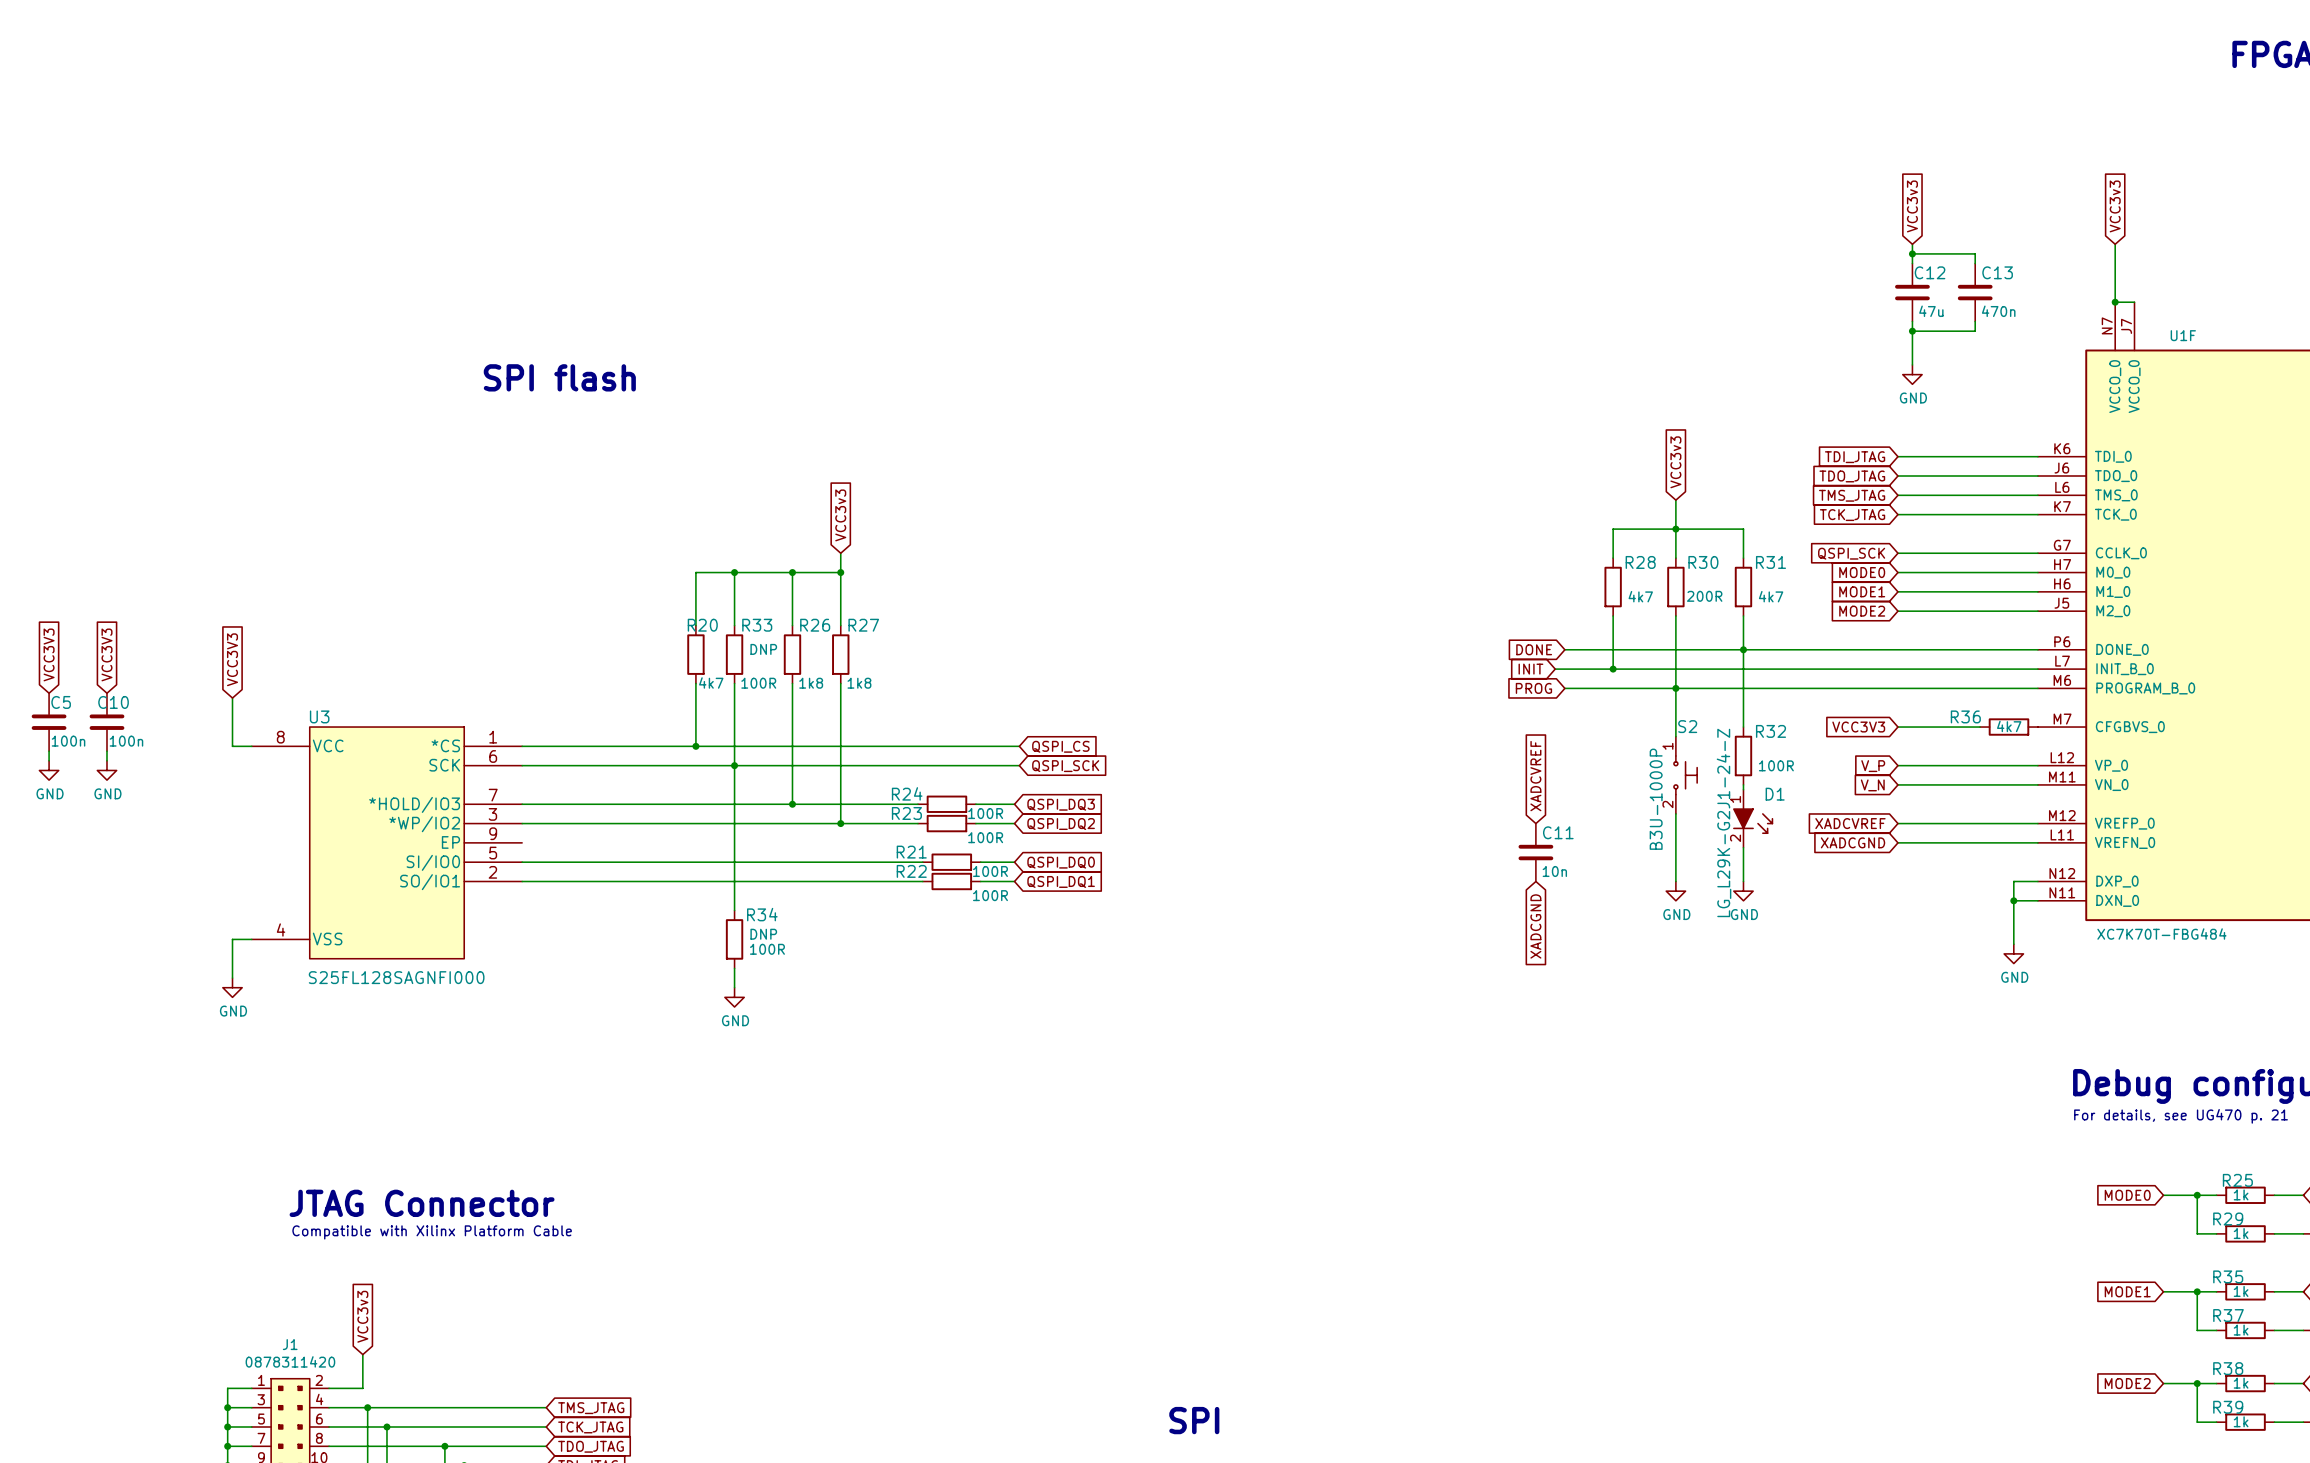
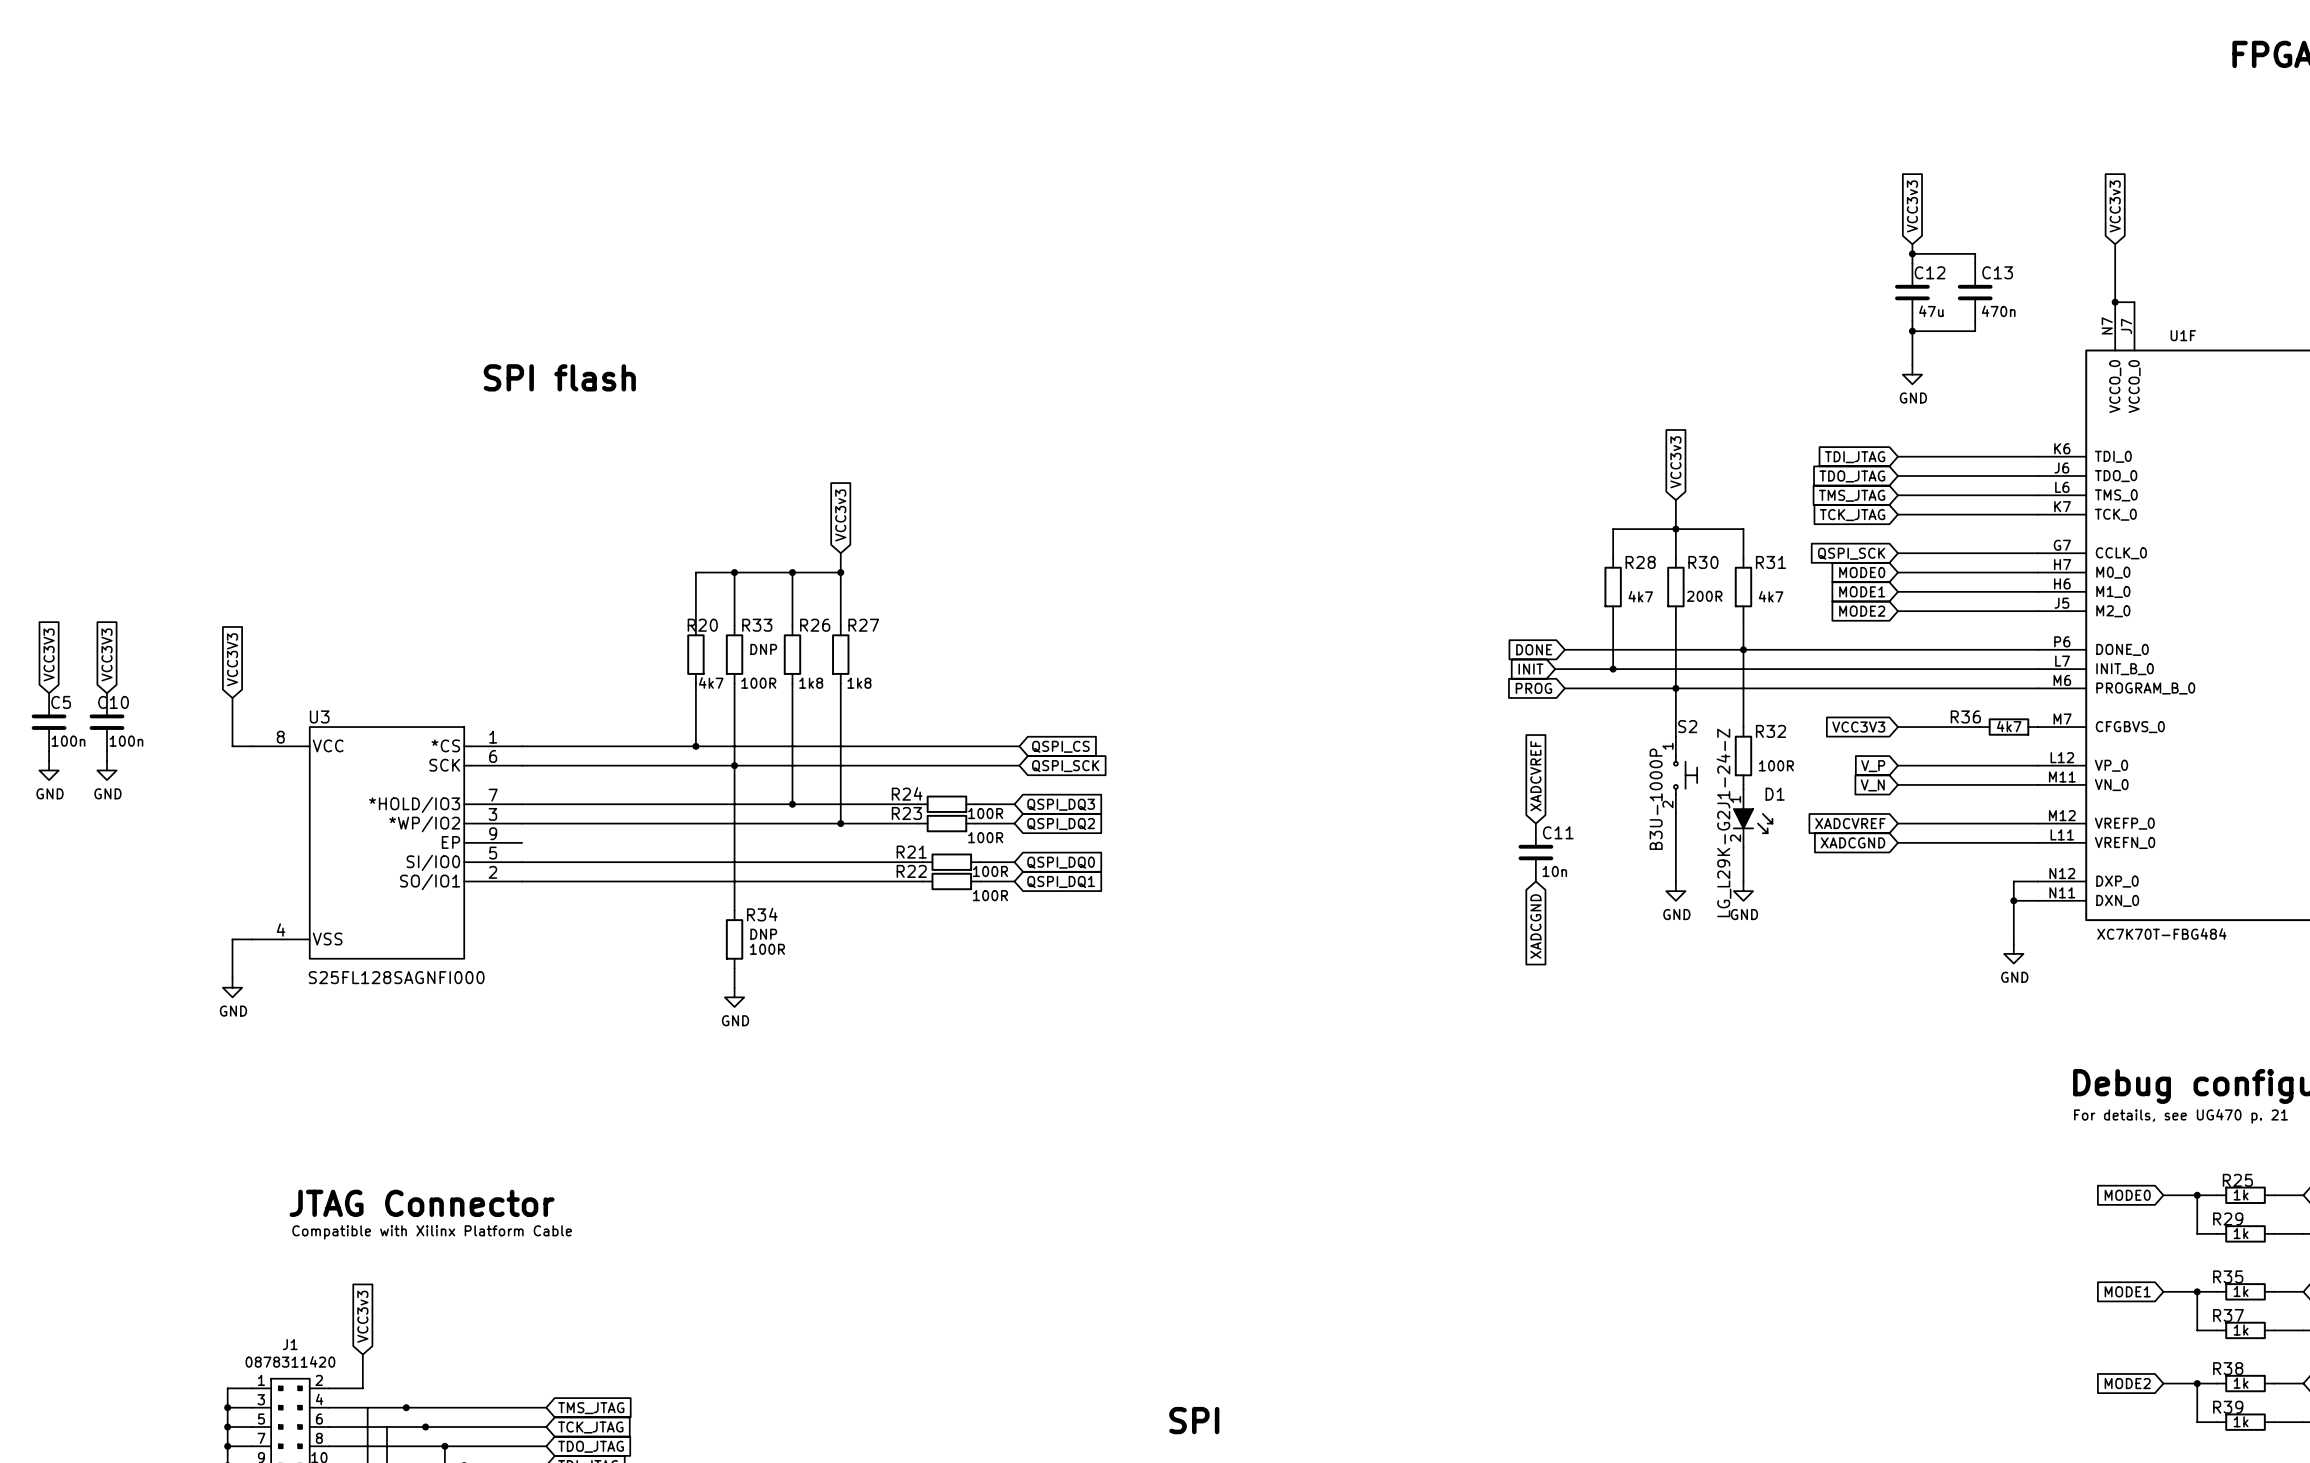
junction: (367, 1407) -> none
junction: none -> (406, 1407)
junction: (386, 1426) -> none
junction: none -> (425, 1426)

